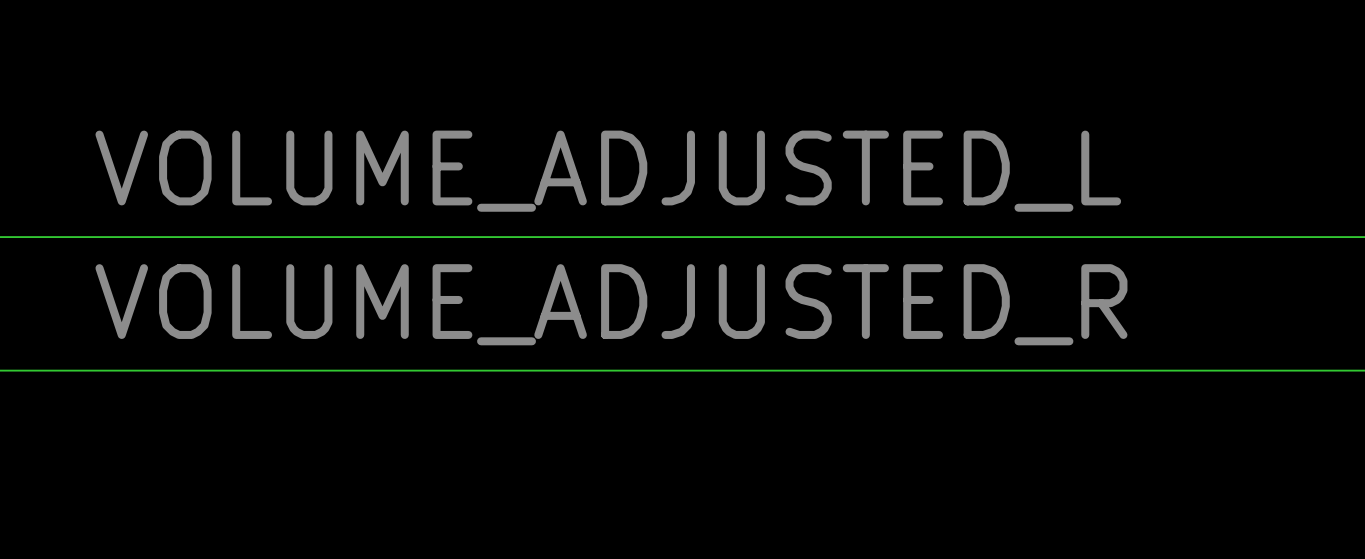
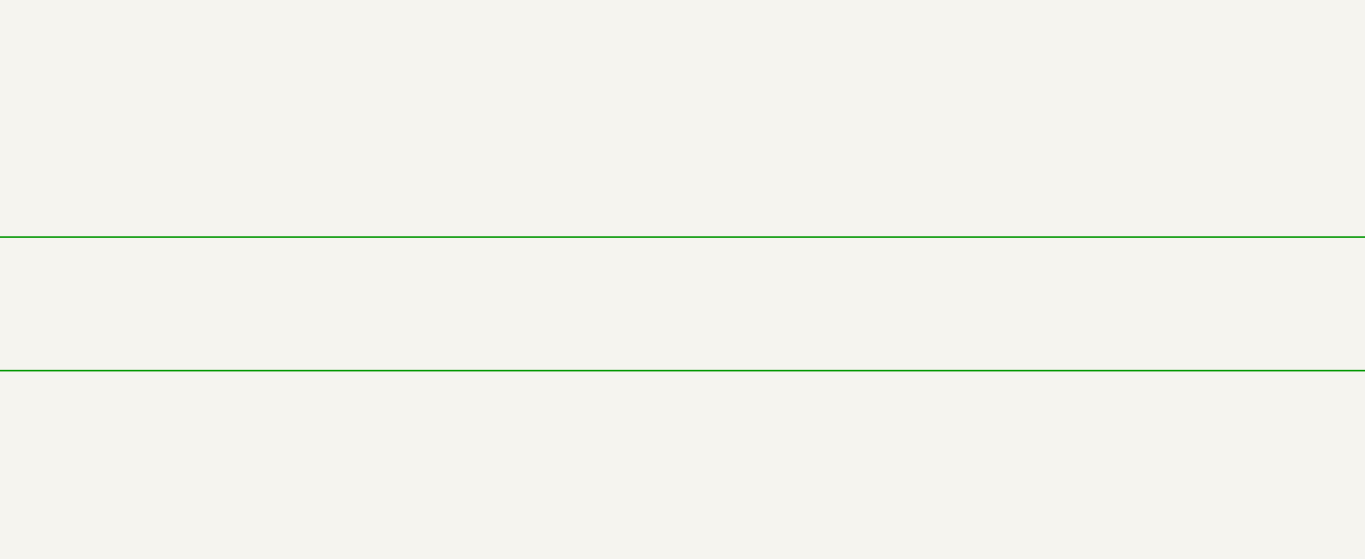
text: VOLUME_ADJUSTED_L (608, 171) -> none
text: VOLUME_ADJUSTED_R (611, 304) -> none

